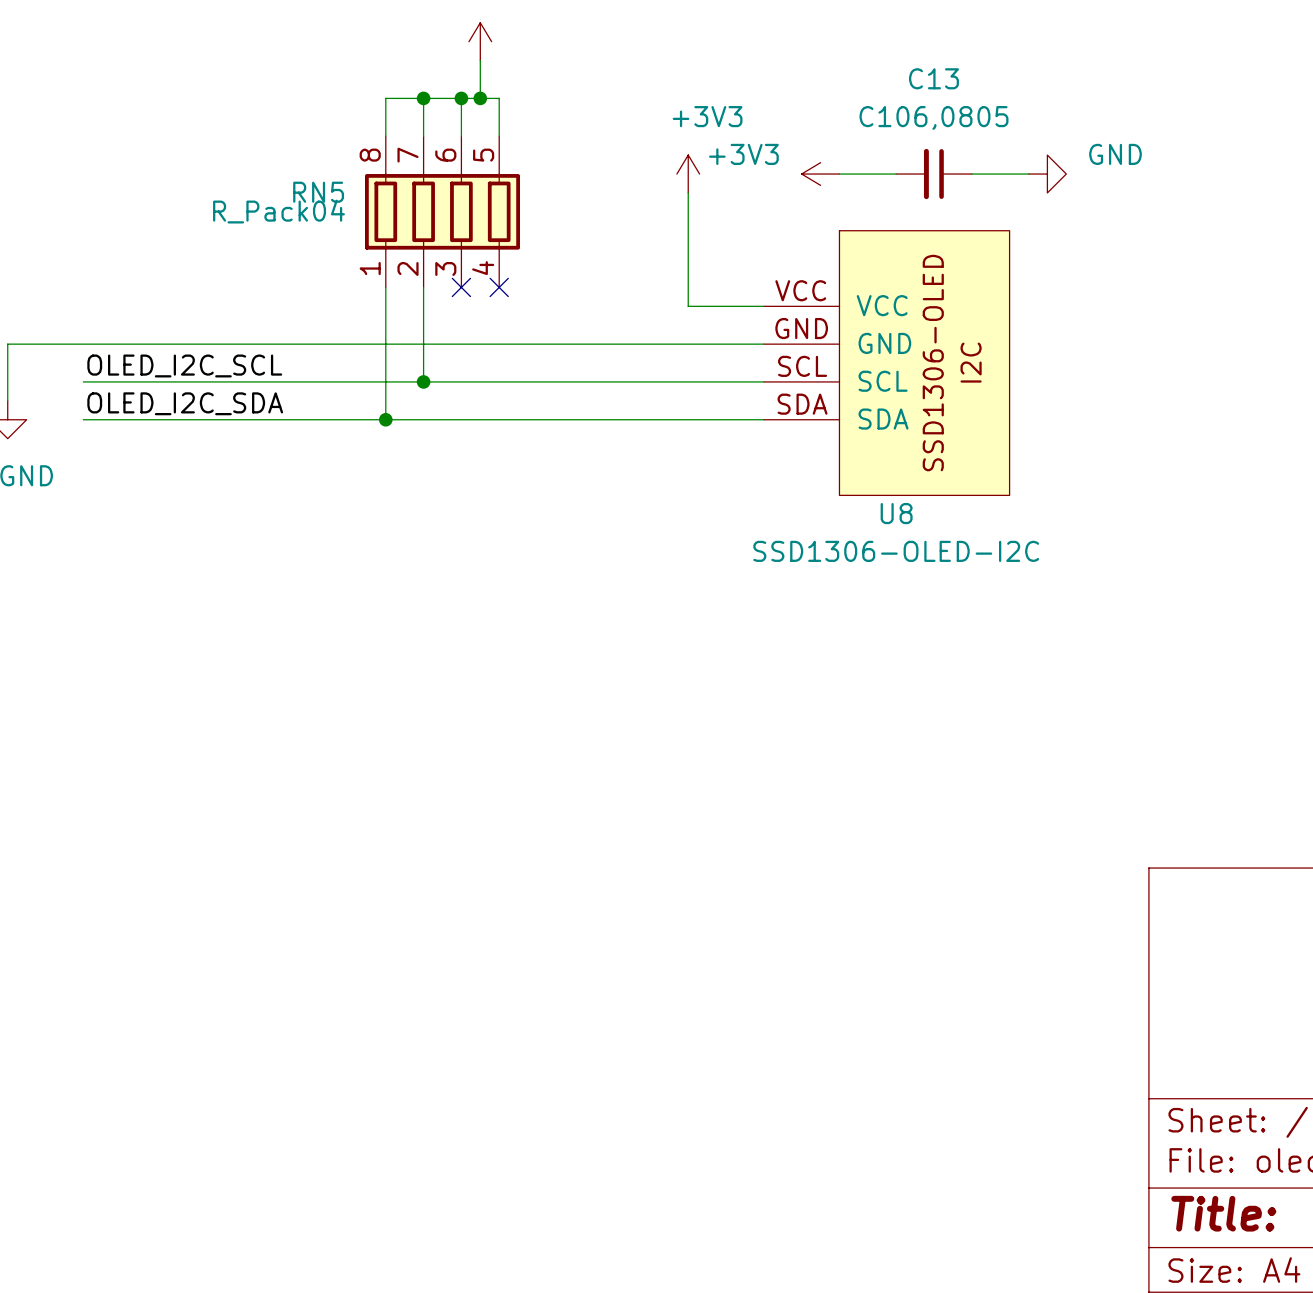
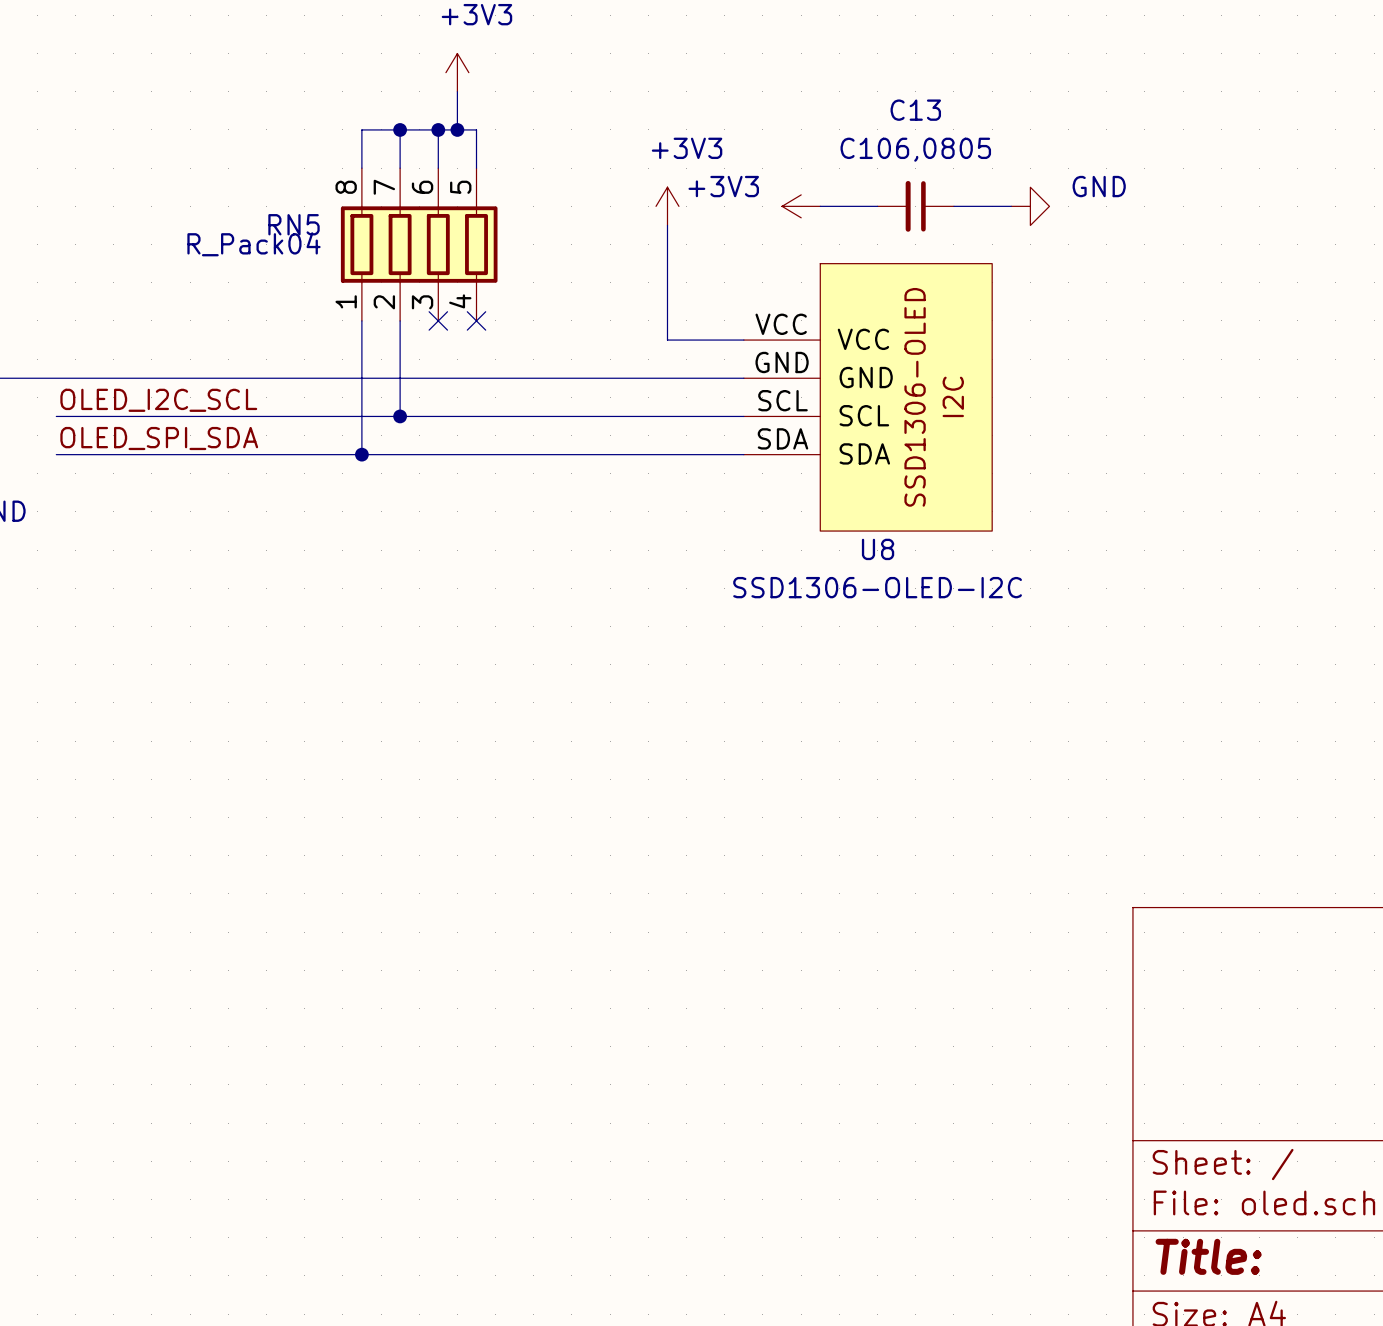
label: OLED_I2C_SDA (185, 403) -> OLED_SPI_SDA (159, 438)

